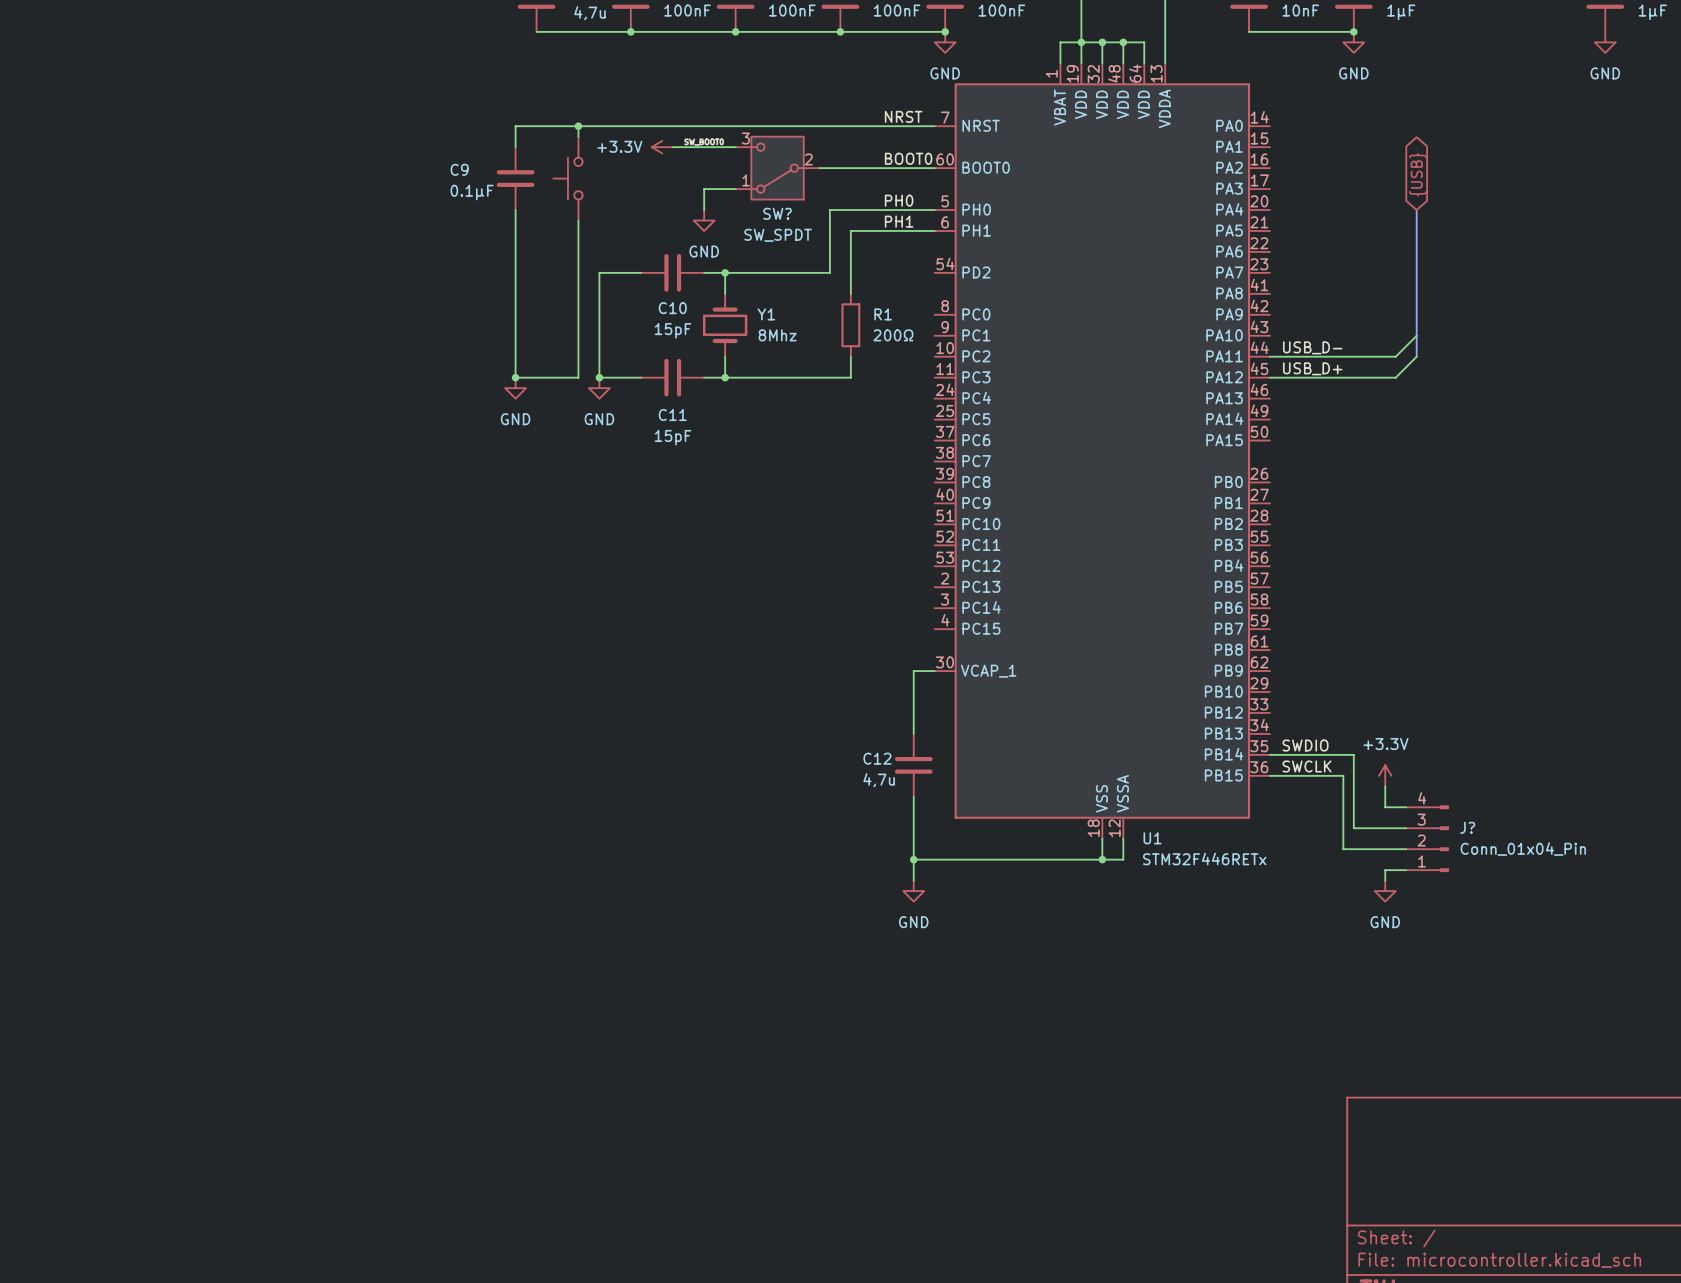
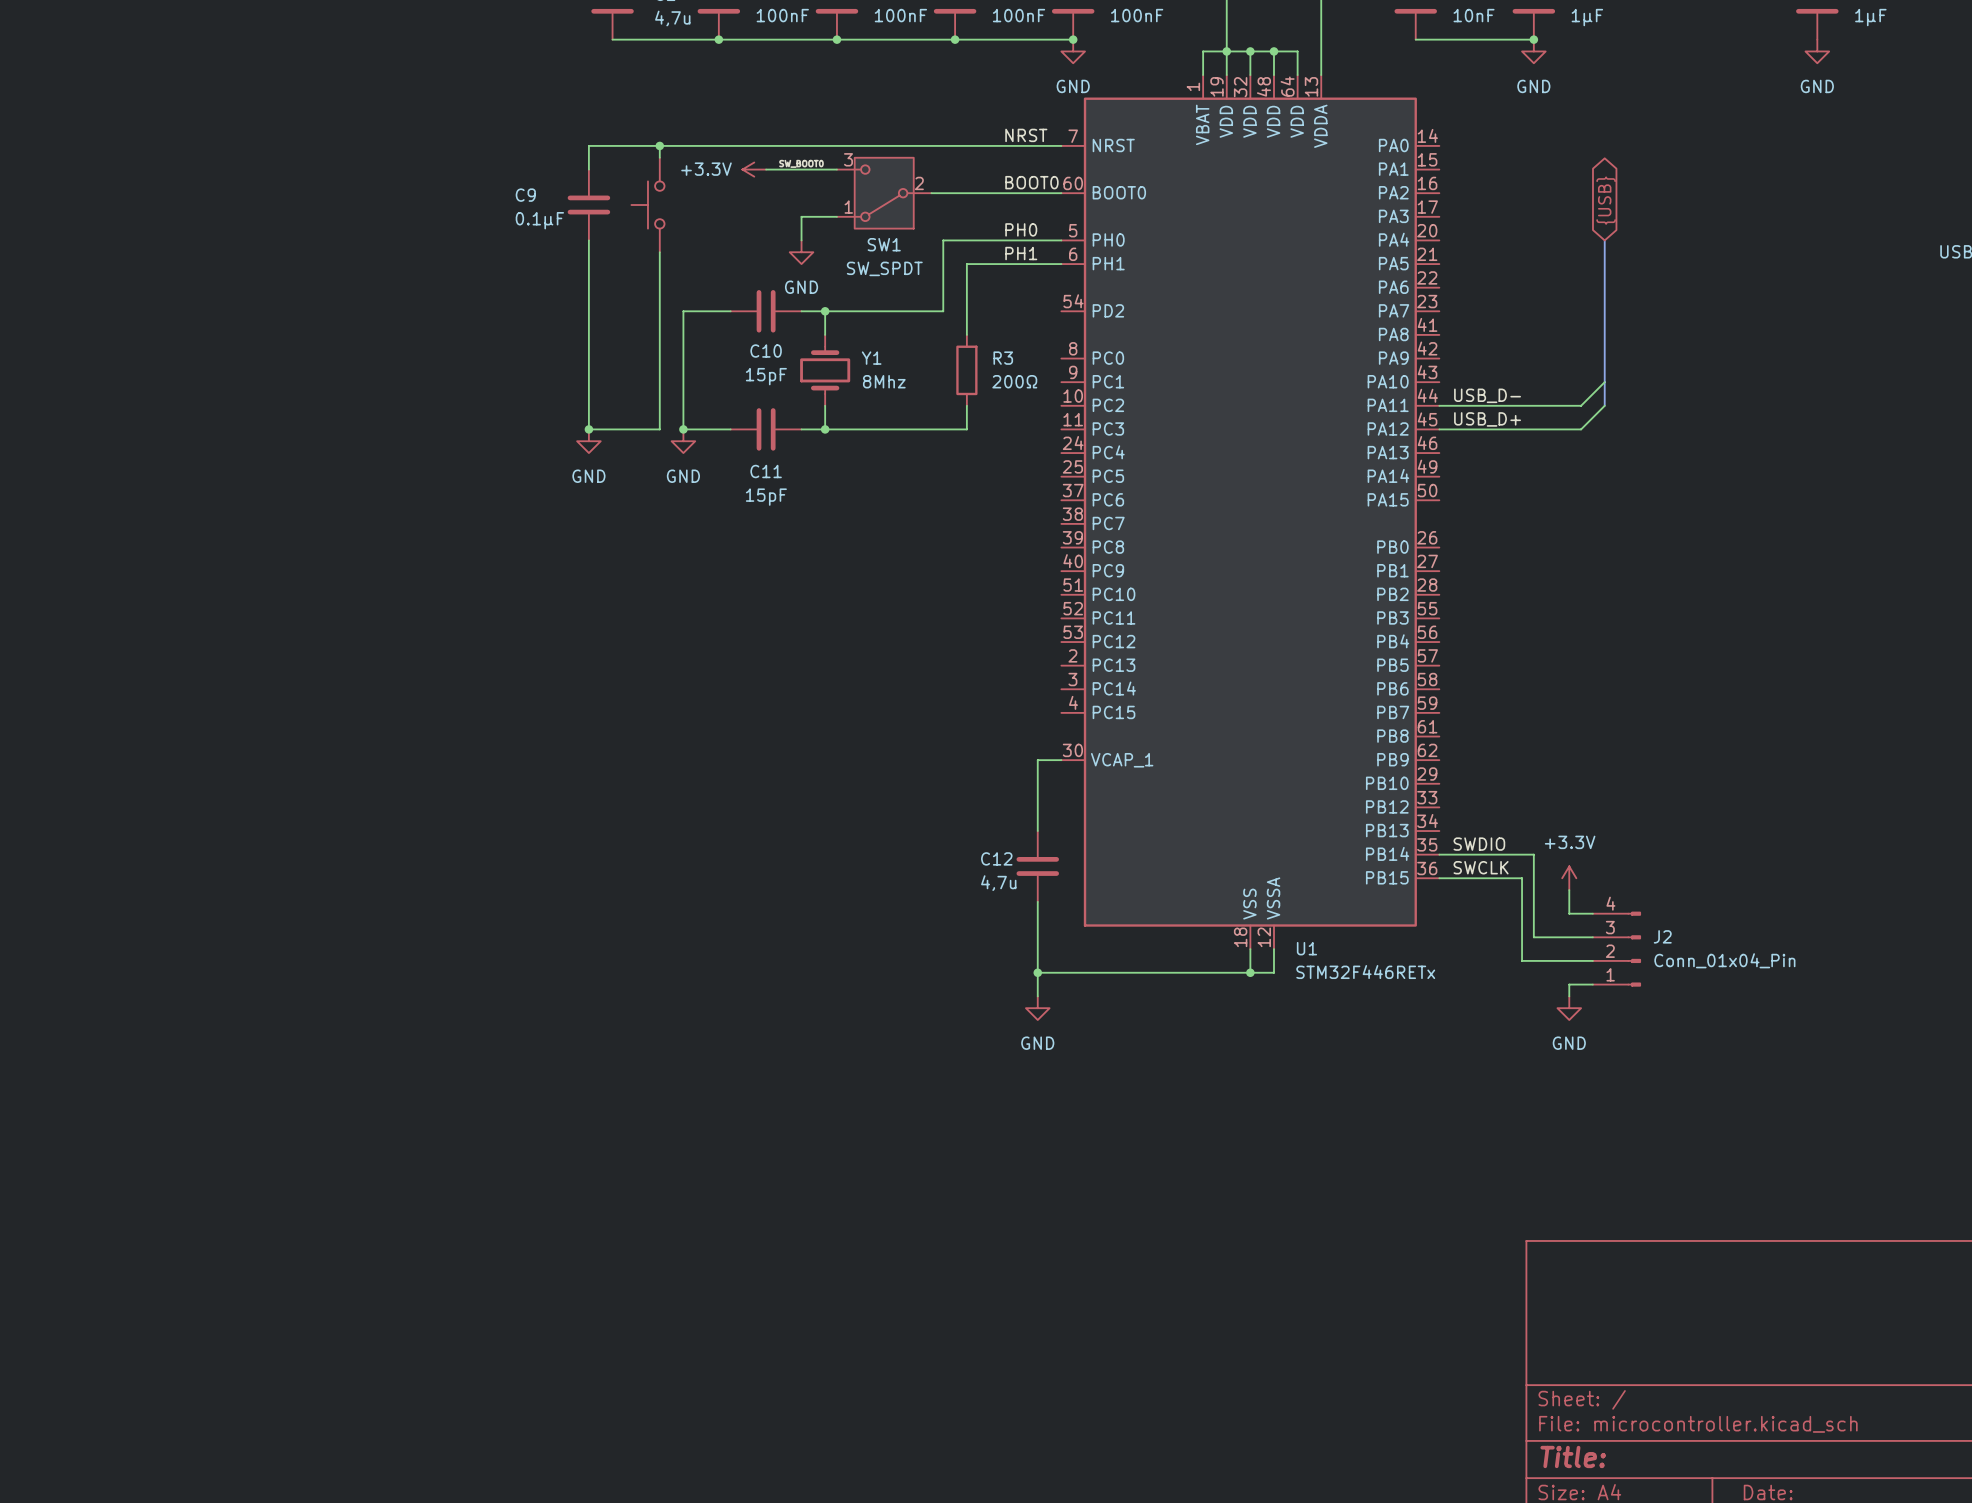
SW? name: SW? (777, 213) -> SW1 (884, 244)
R1 name: R1 (883, 314) -> R3 (1003, 358)
J? name: J? (1467, 827) -> J2 (1662, 936)

